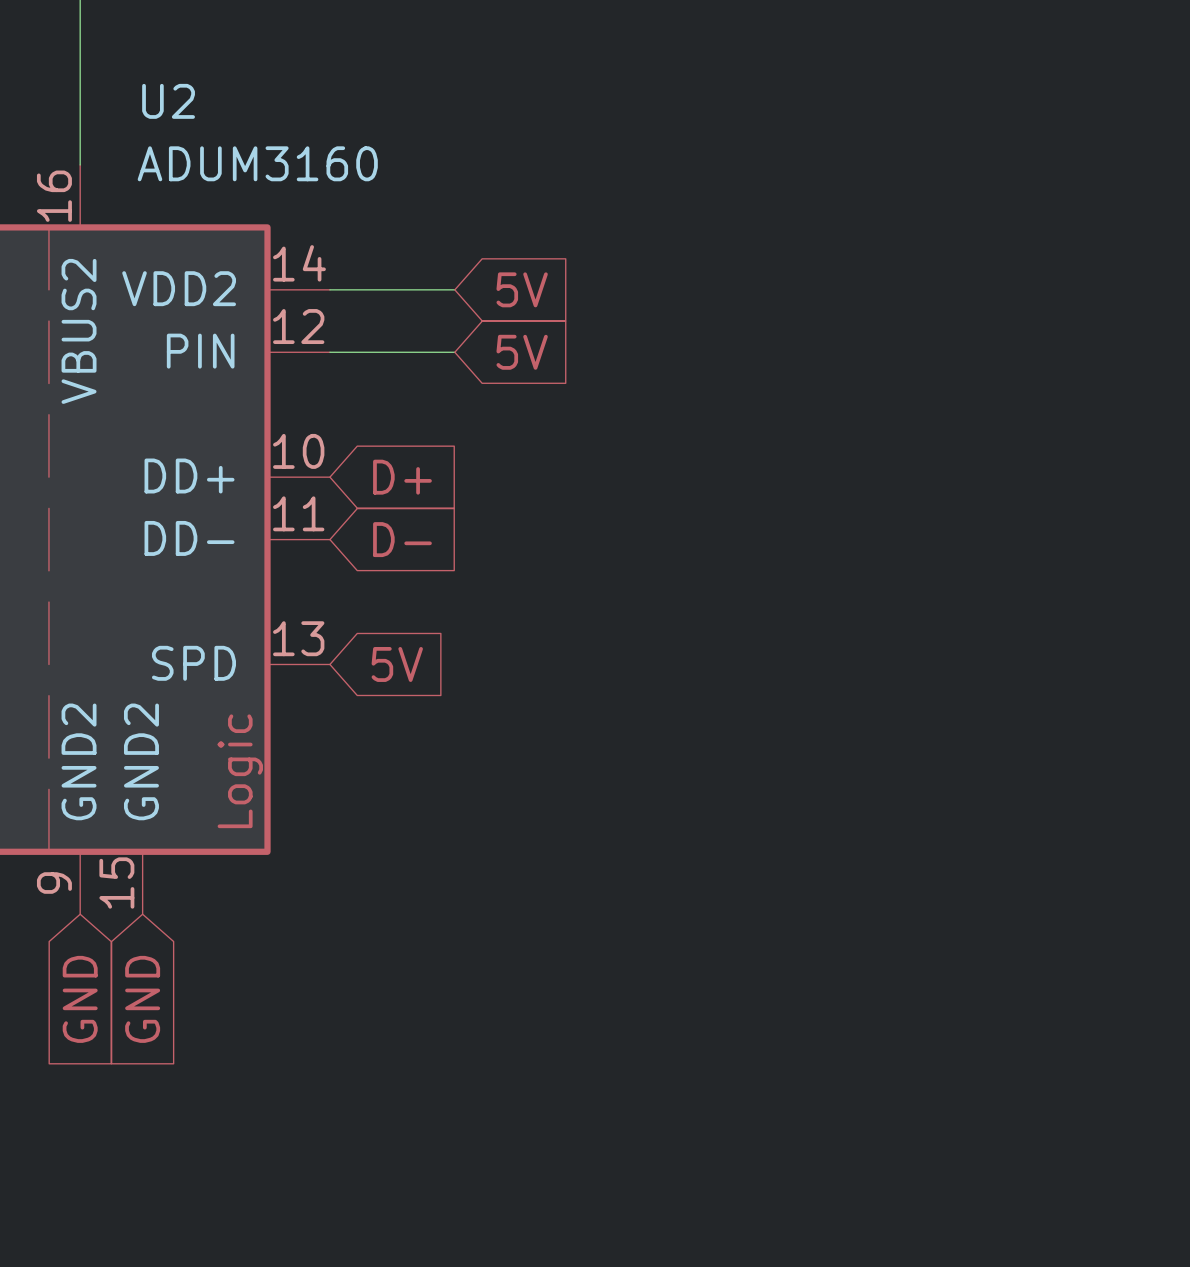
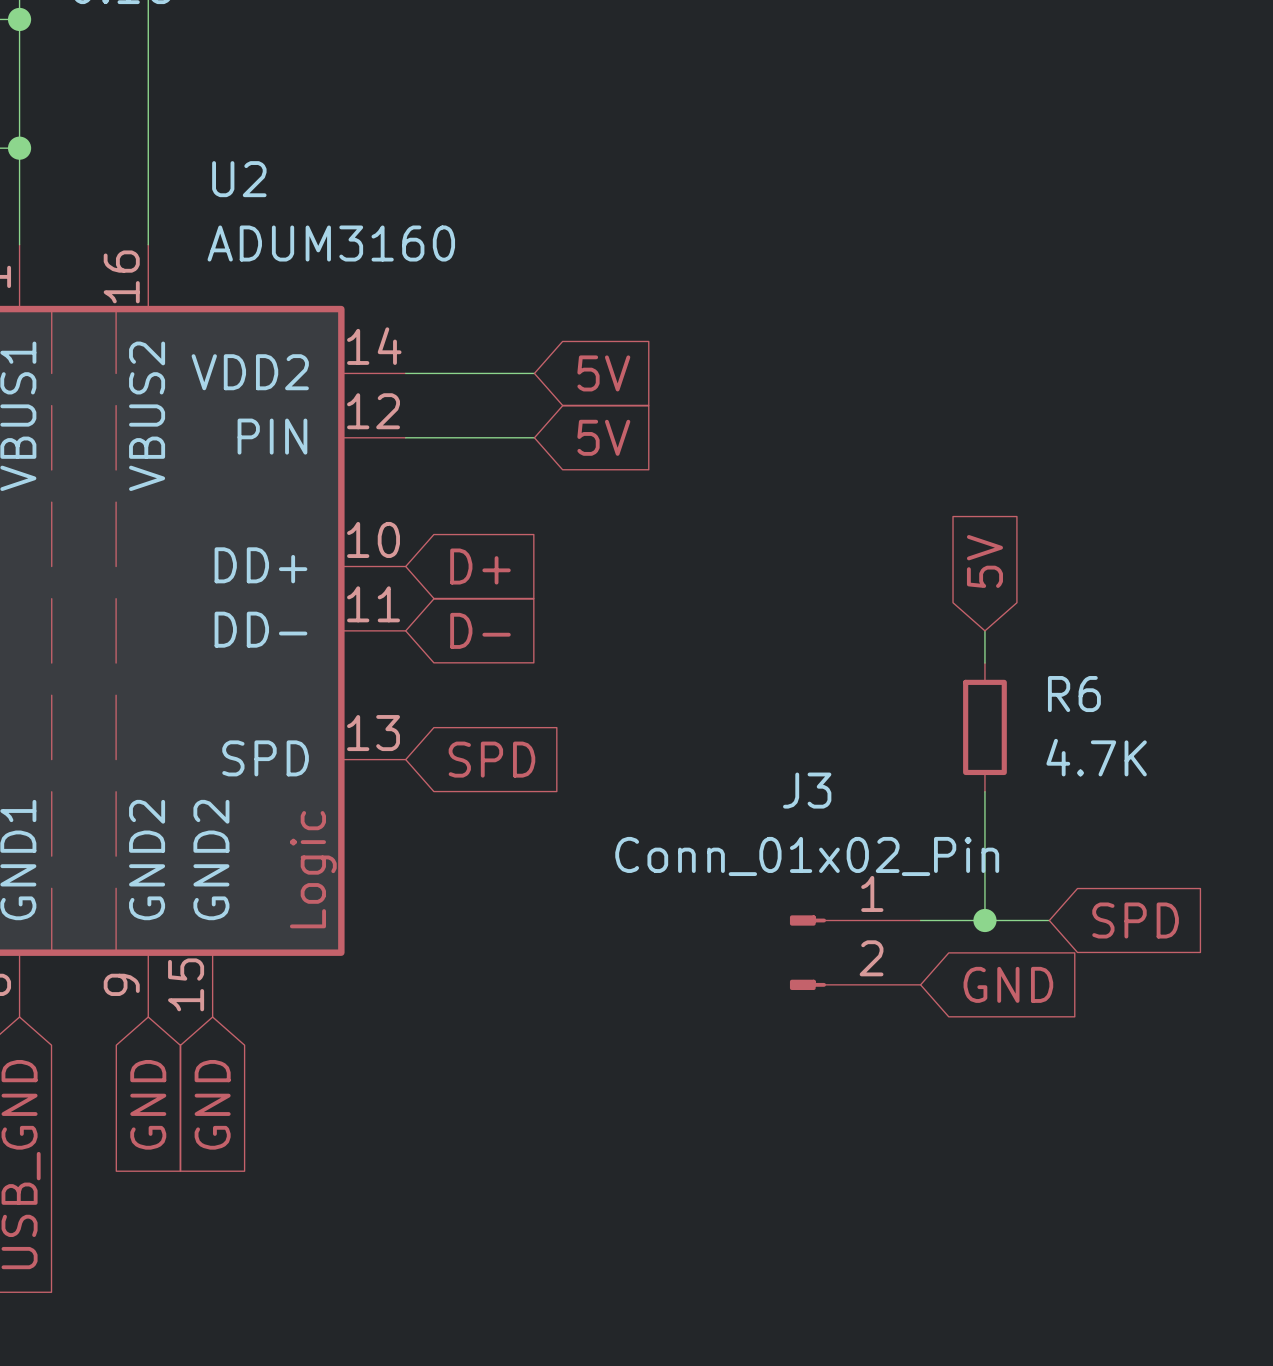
global label: none -> 5V (984, 561)
wire: none -> (984, 630) (984, 663)
R6: none -> 4.7K (984, 727)
global label: 5V (397, 664) -> SPD (491, 759)
wire: none -> (984, 791) (984, 920)
wire: none -> (920, 920) (1049, 920)
junction: none -> (984, 920)
global label: none -> SPD (1135, 920)
J3: none -> Conn_01x02_Pin (855, 952)
global label: none -> GND (1008, 984)

